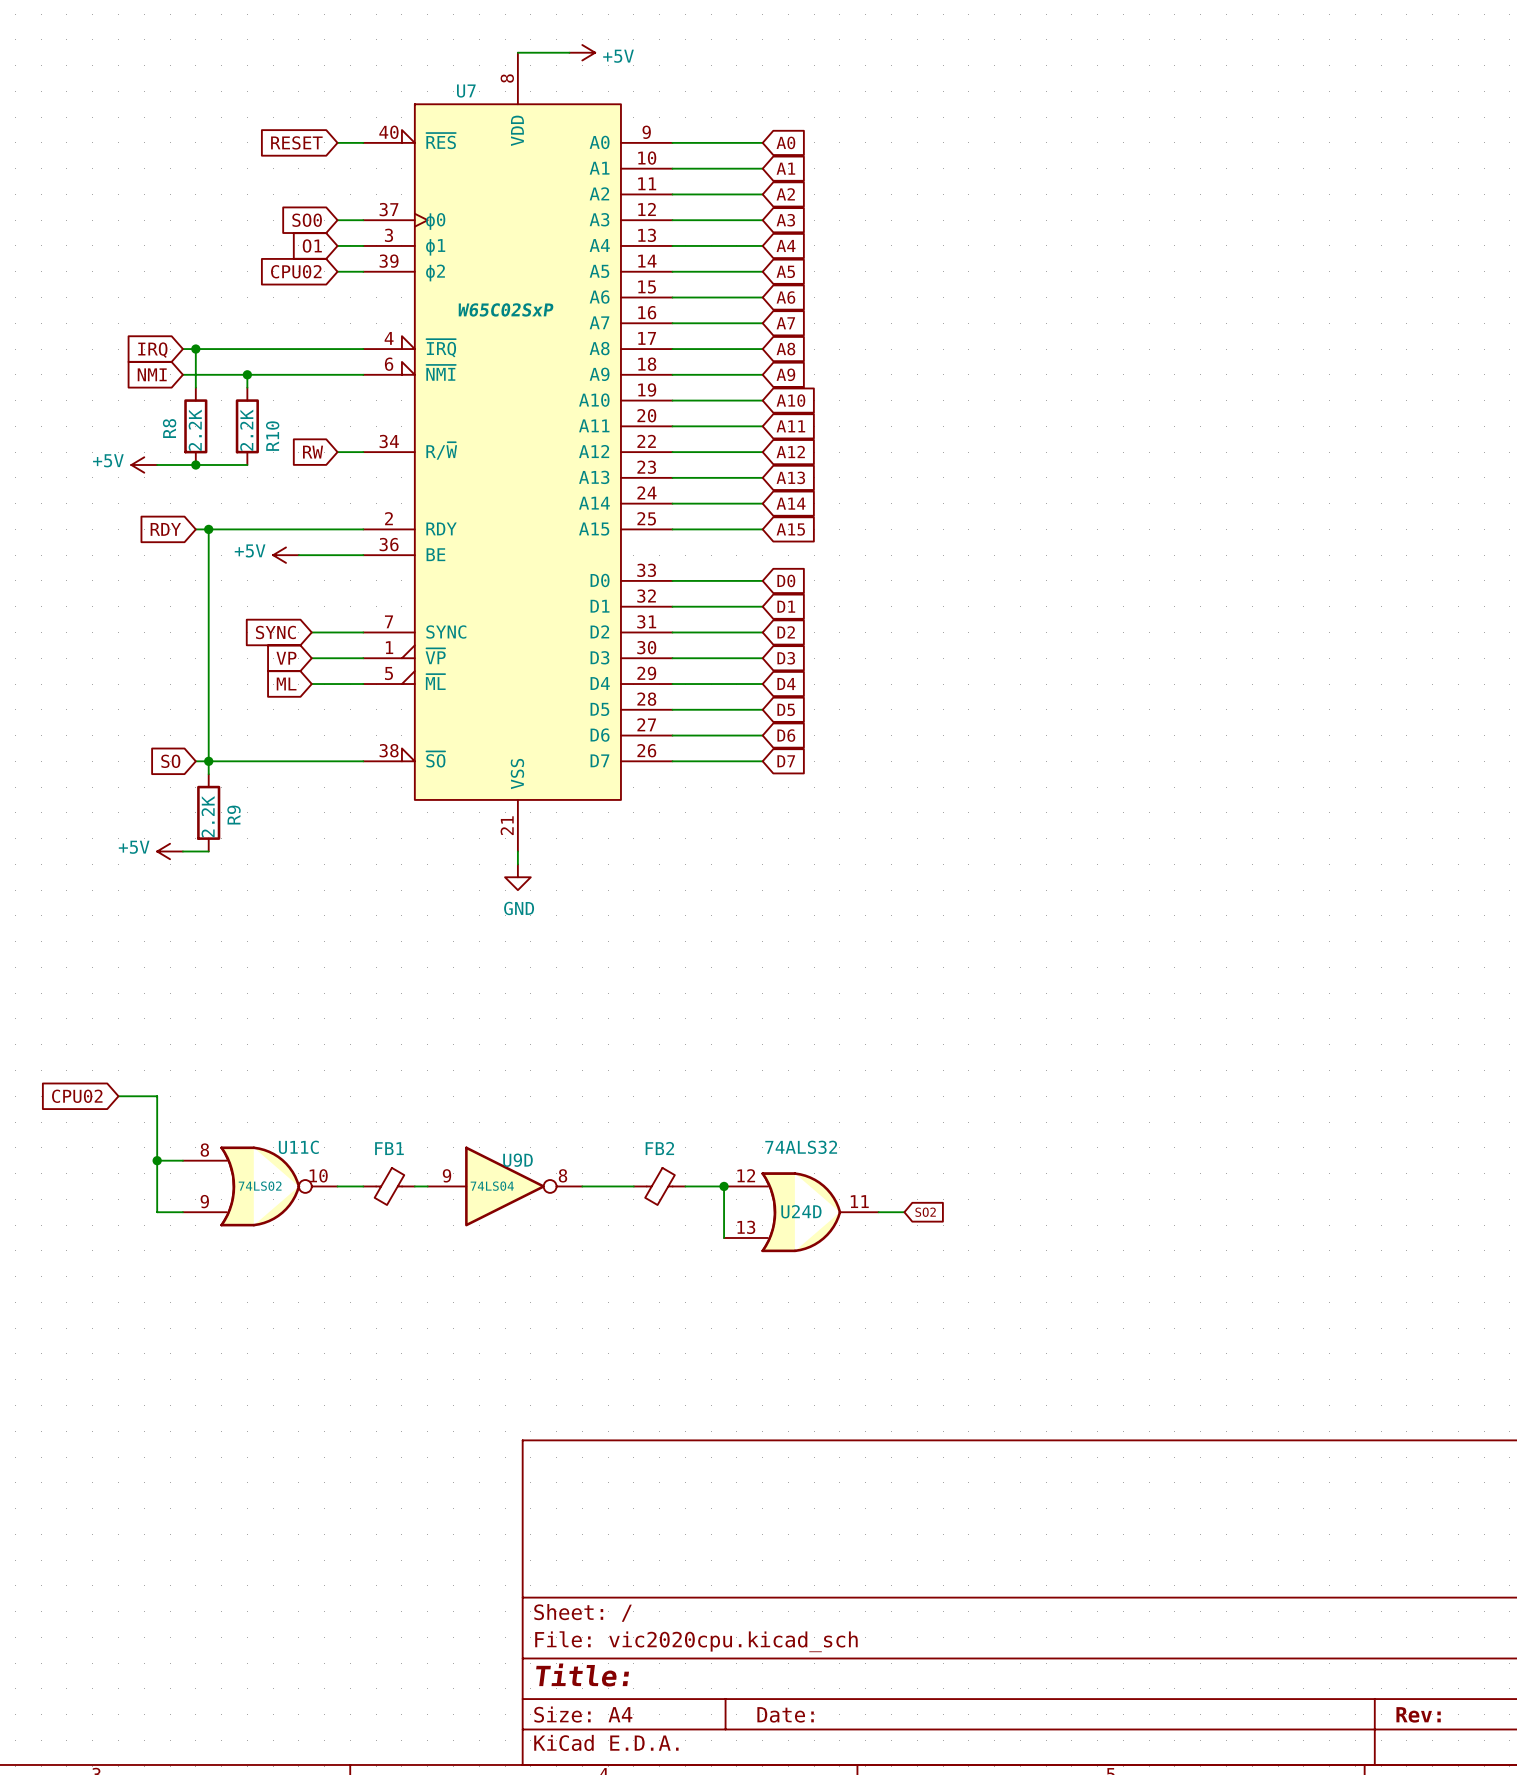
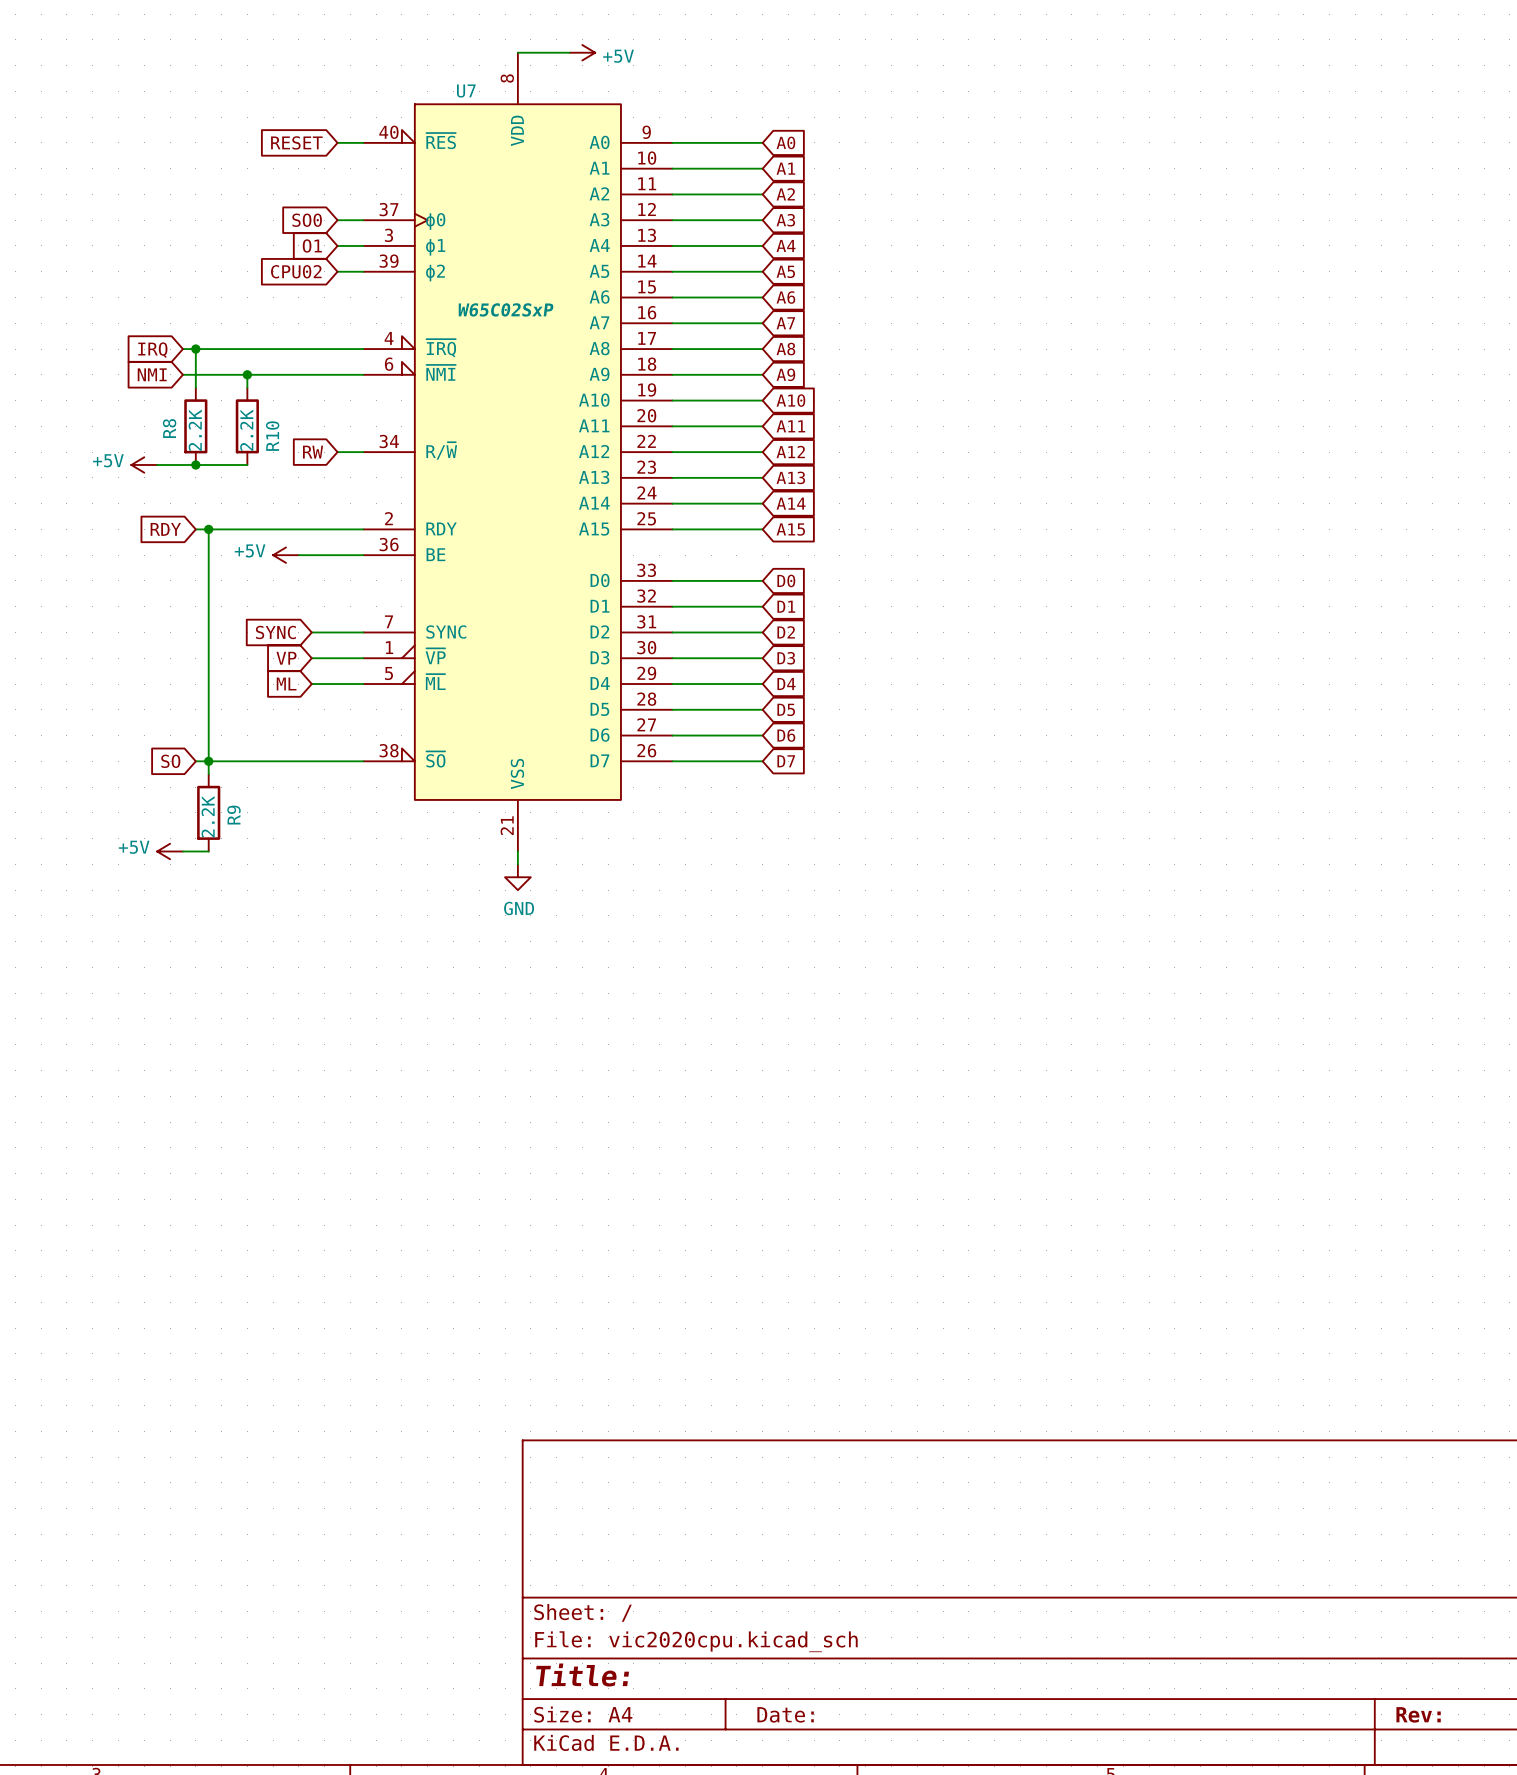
global label: CPU02 (77, 1096) -> none
wire: (118, 1096) (157, 1096) (157, 1212) (182, 1212) -> none
wire: (157, 1160) (182, 1160) -> none
junction: (157, 1160) -> none
U11C: 74LS02 (260, 1186) -> none
wire: (337, 1186) (363, 1186) -> none
FB1: (389, 1186) -> none
wire: (414, 1186) (427, 1186) -> none
U9D: 74LS04 (505, 1186) -> none
wire: (582, 1186) (633, 1186) -> none
FB2: (659, 1186) -> none
wire: (685, 1186) (724, 1186) (724, 1237) -> none
junction: (724, 1186) -> none
U24D: 74ALS32 (801, 1212) -> none
wire: (878, 1212) (904, 1212) -> none
global label: SO2 (925, 1212) -> none

